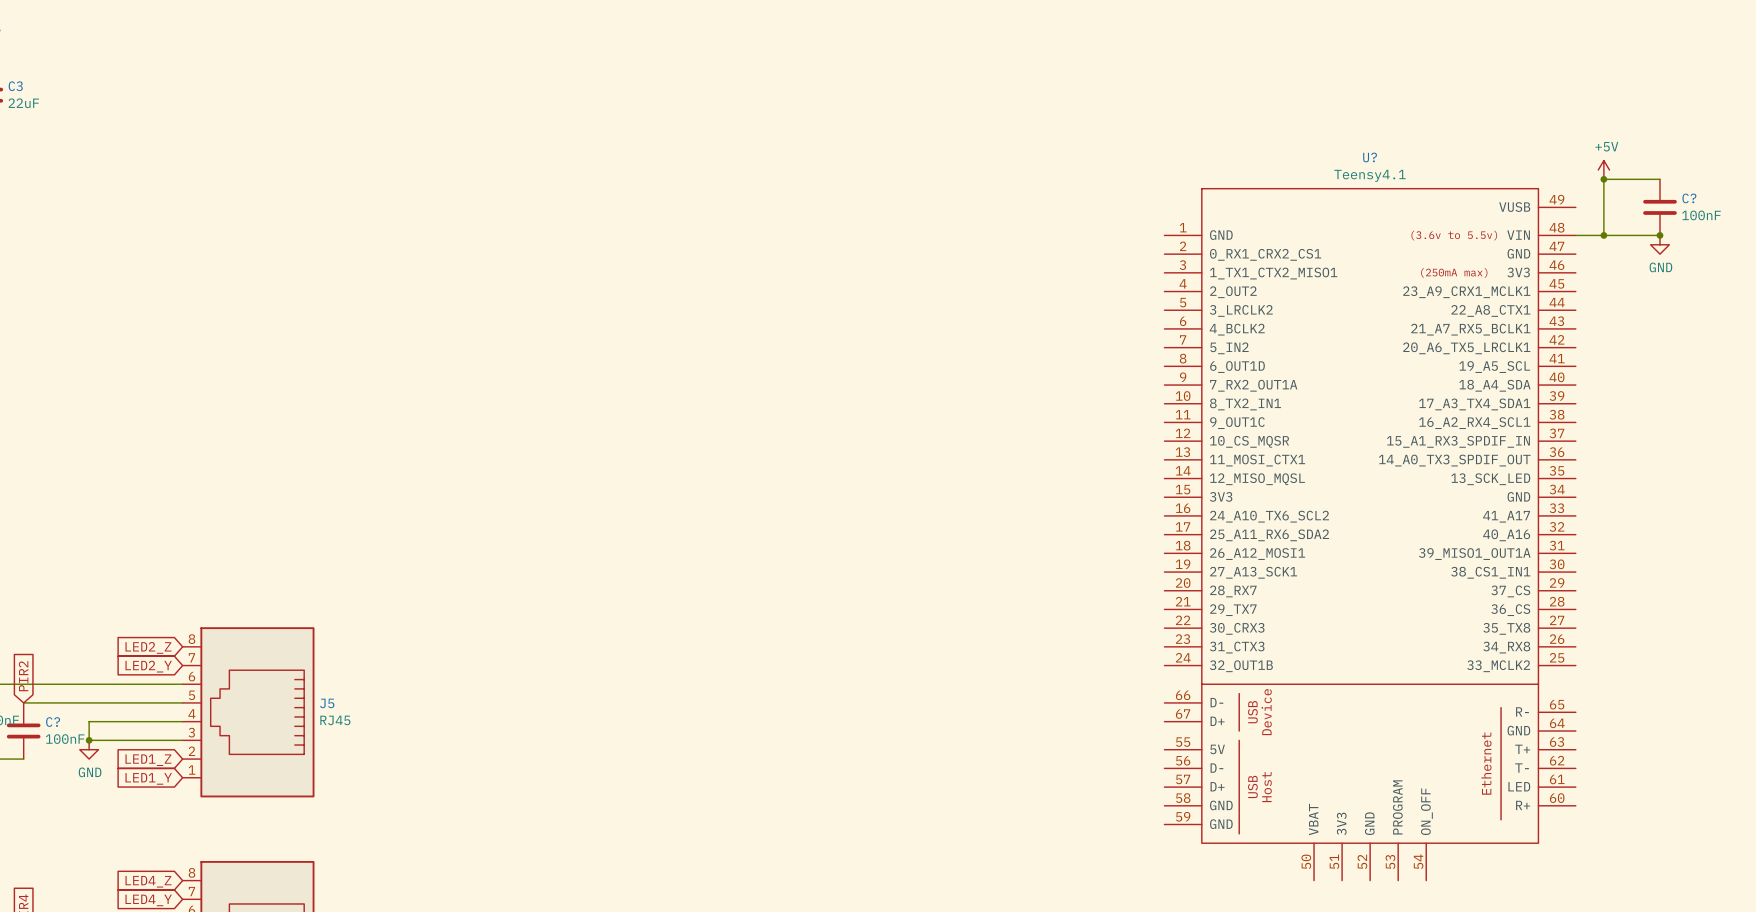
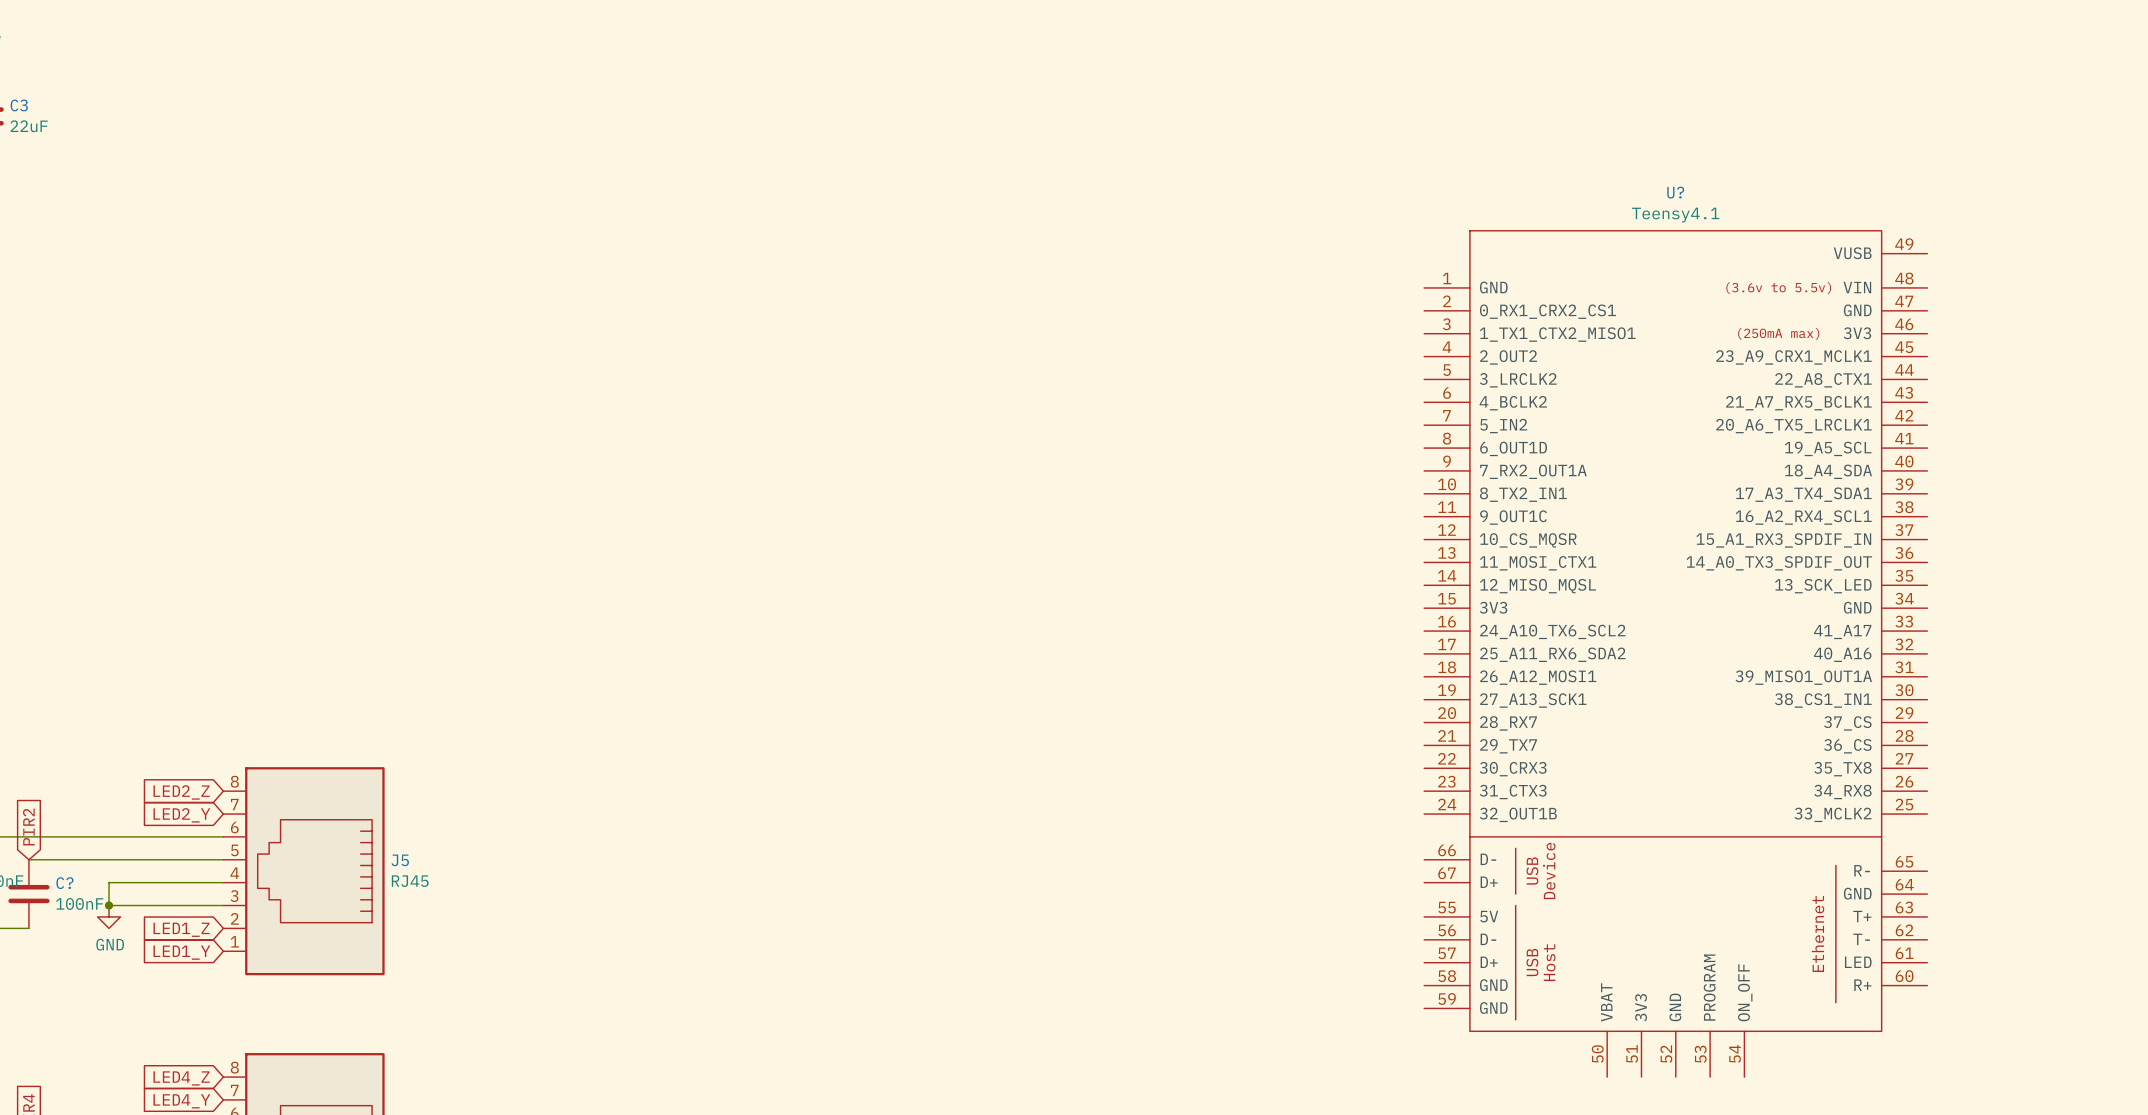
power symbol: +5V (1603, 169) -> none
junction: (1603, 179) -> none
wire: (1659, 179) (1603, 179) (1603, 235) -> none
C?: 100nF (1659, 207) -> none
wire: (1575, 235) (1659, 235) -> none
junction: (1603, 235) -> none
junction: (1659, 235) -> none
power symbol: GND (1659, 244) -> none

